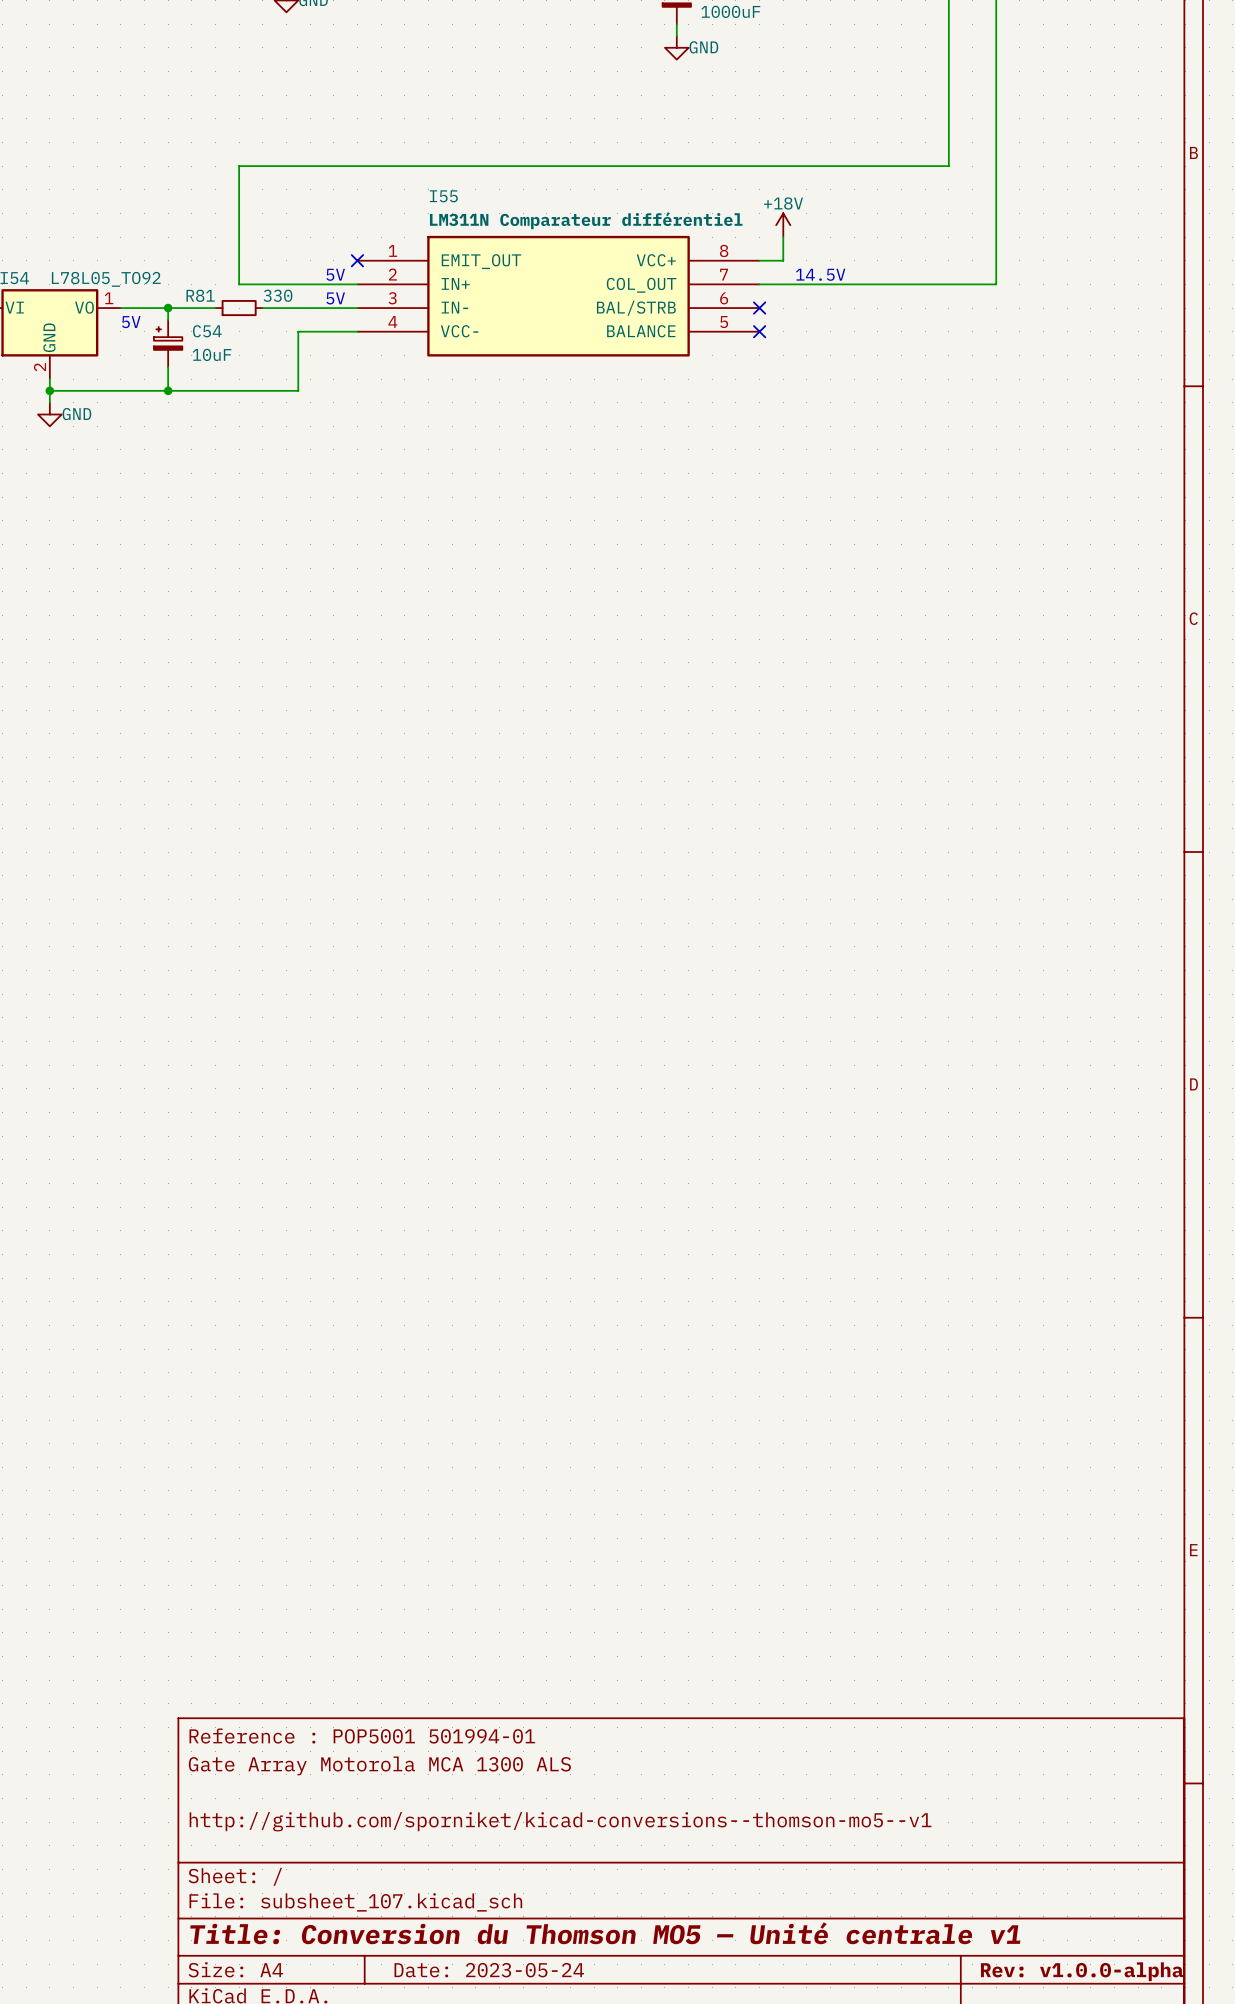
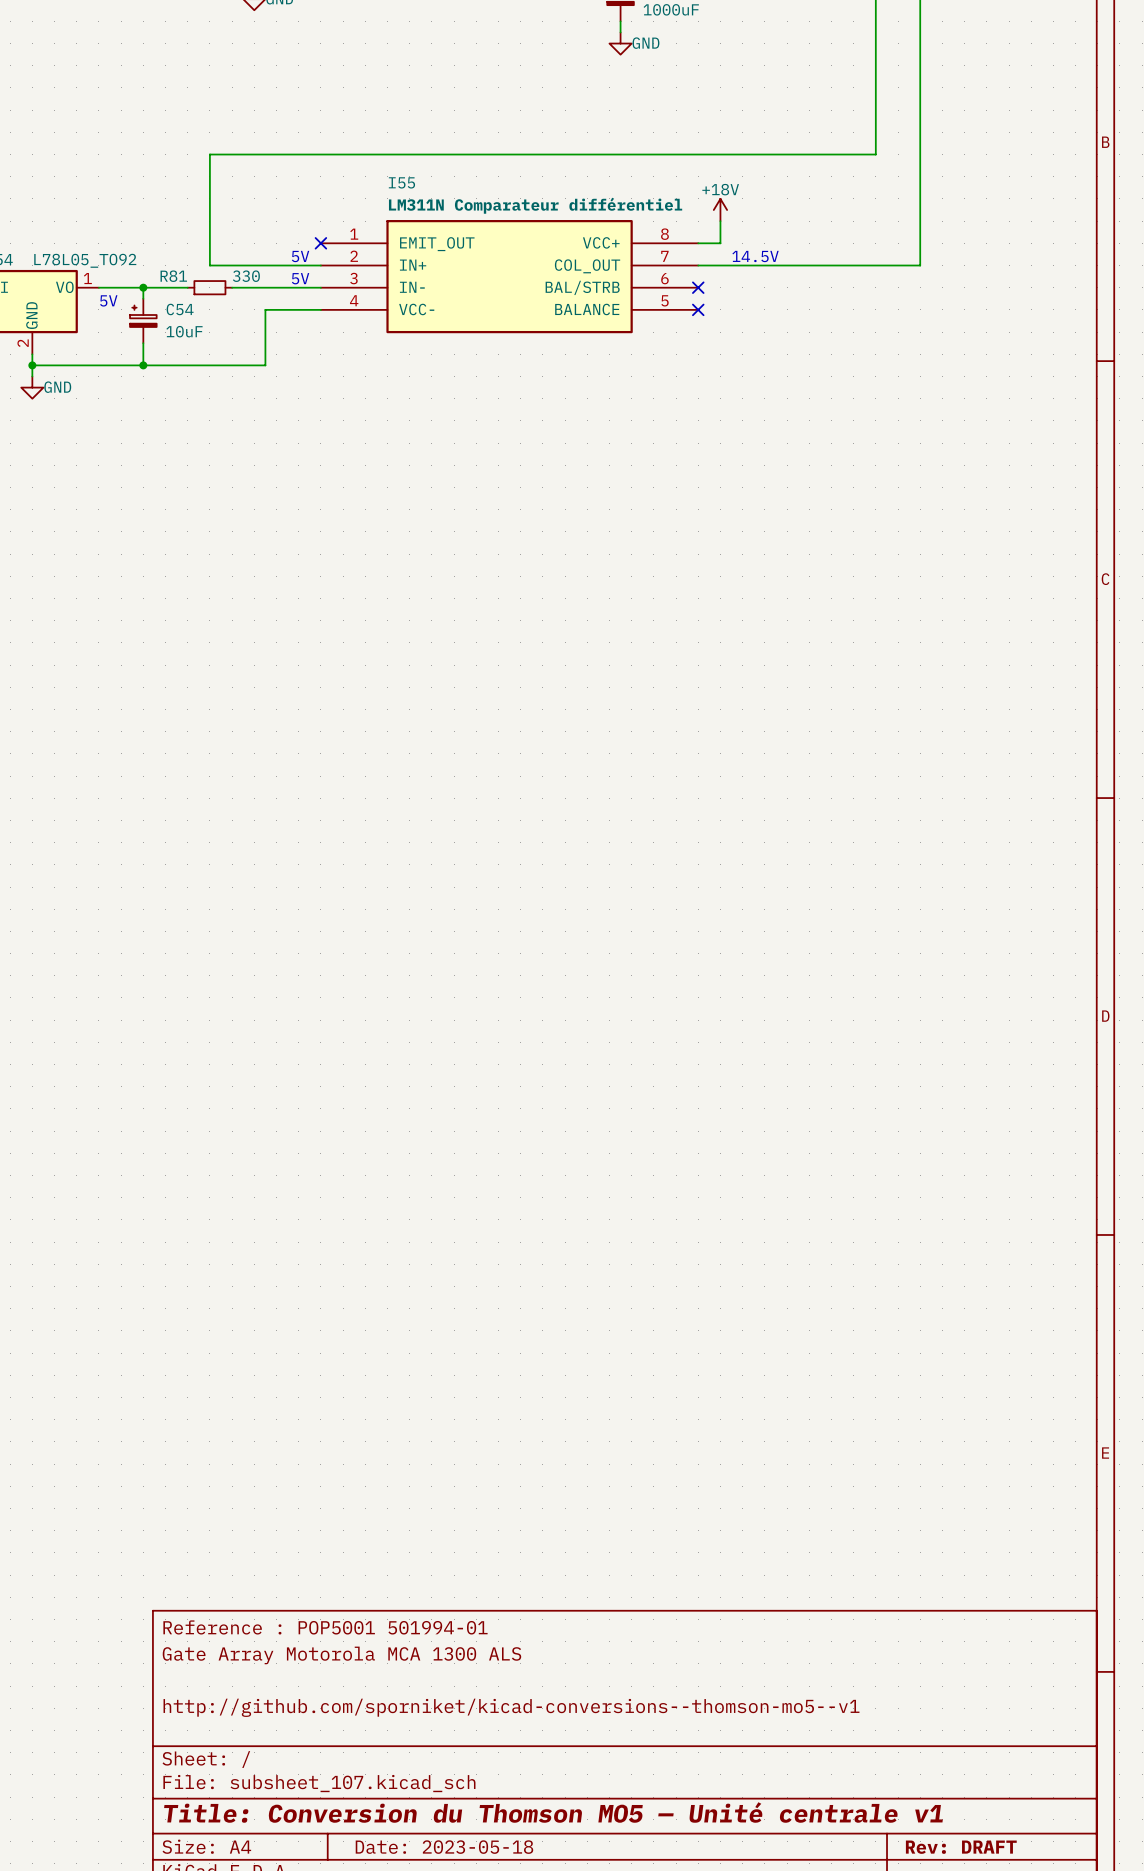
title block: Date: 2023-05-24 (489, 1970) -> Date: 2023-05-18 (444, 1847)
title block: Rev: v1.0.0-alpha (1082, 1971) -> Rev: DRAFT (961, 1847)

